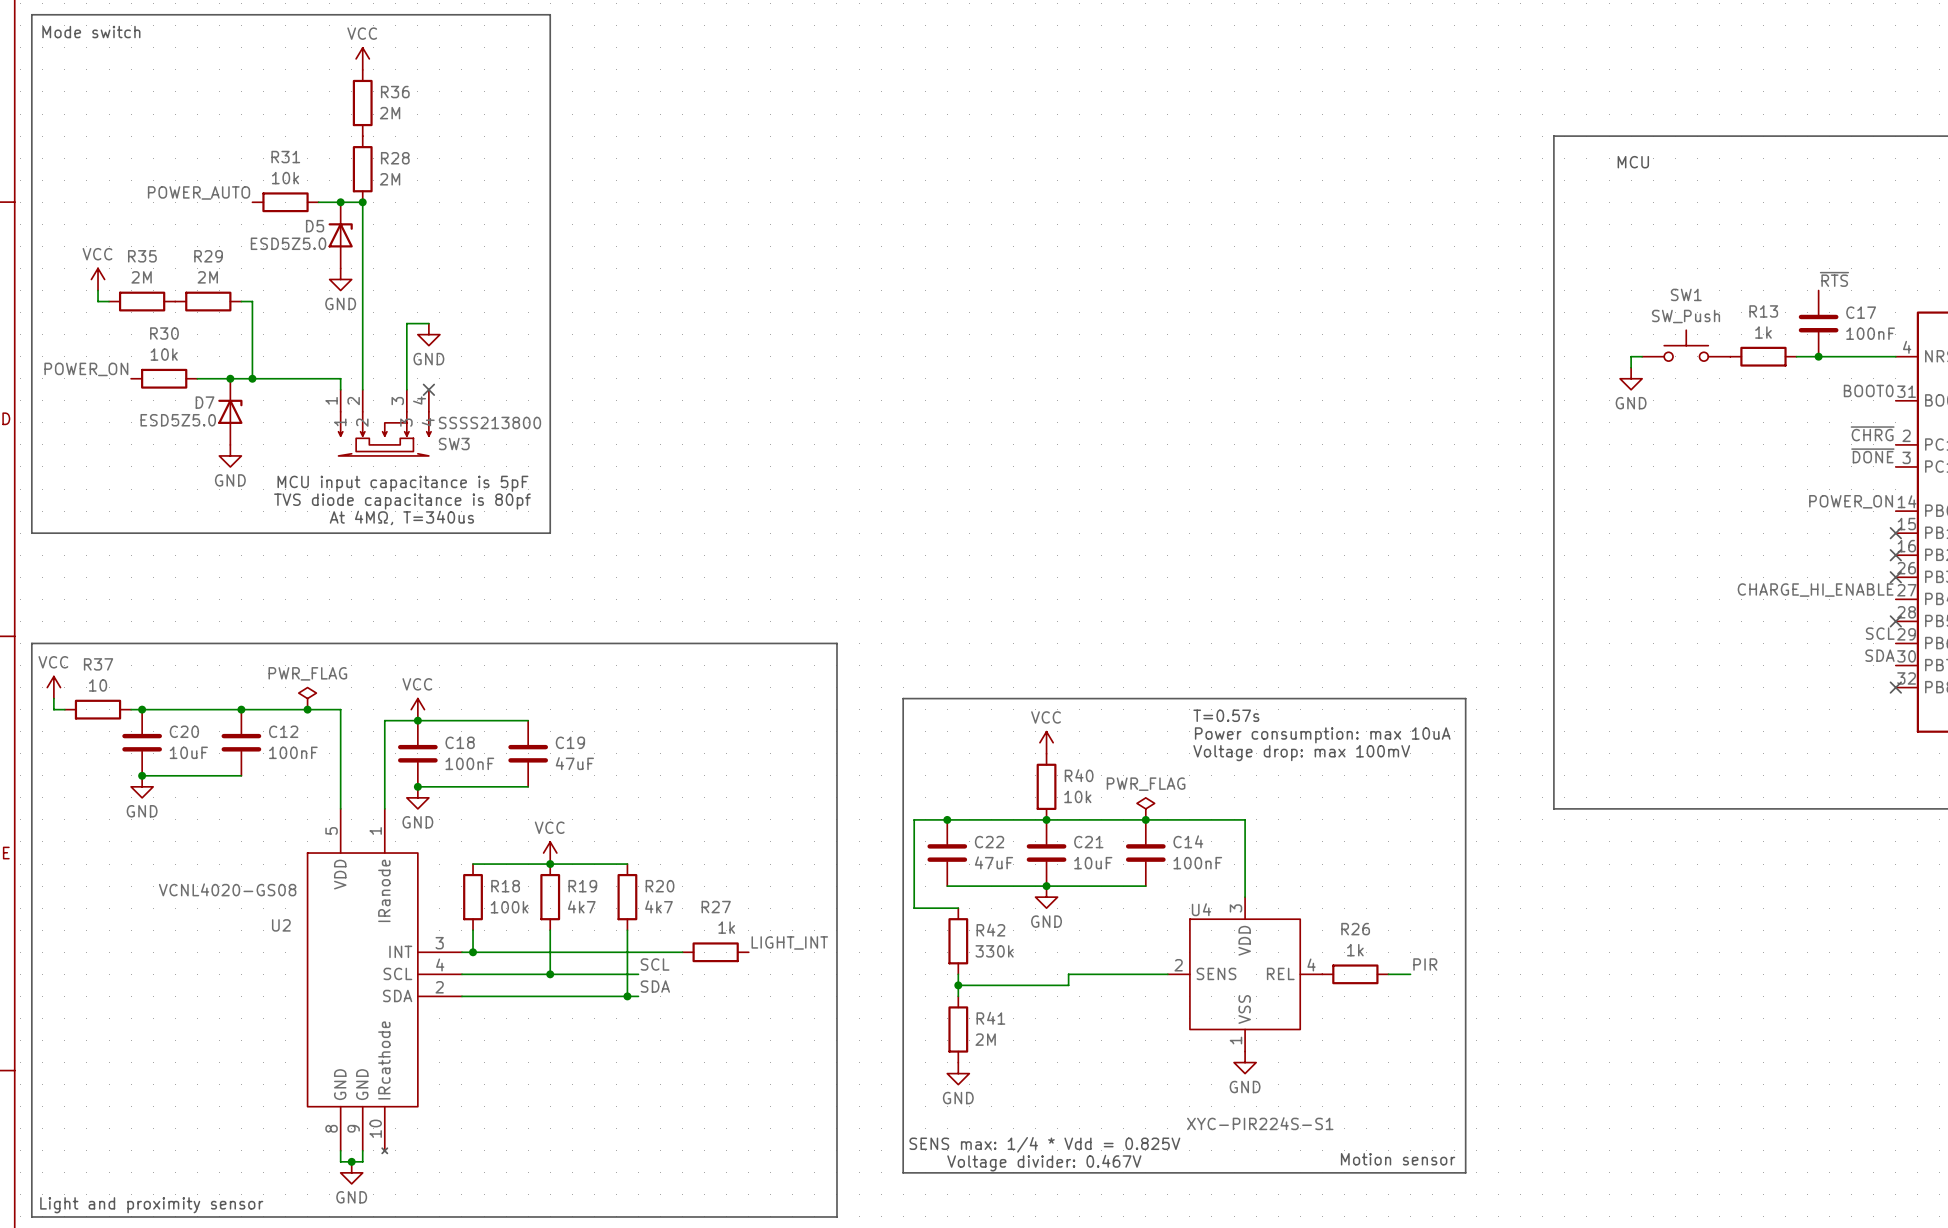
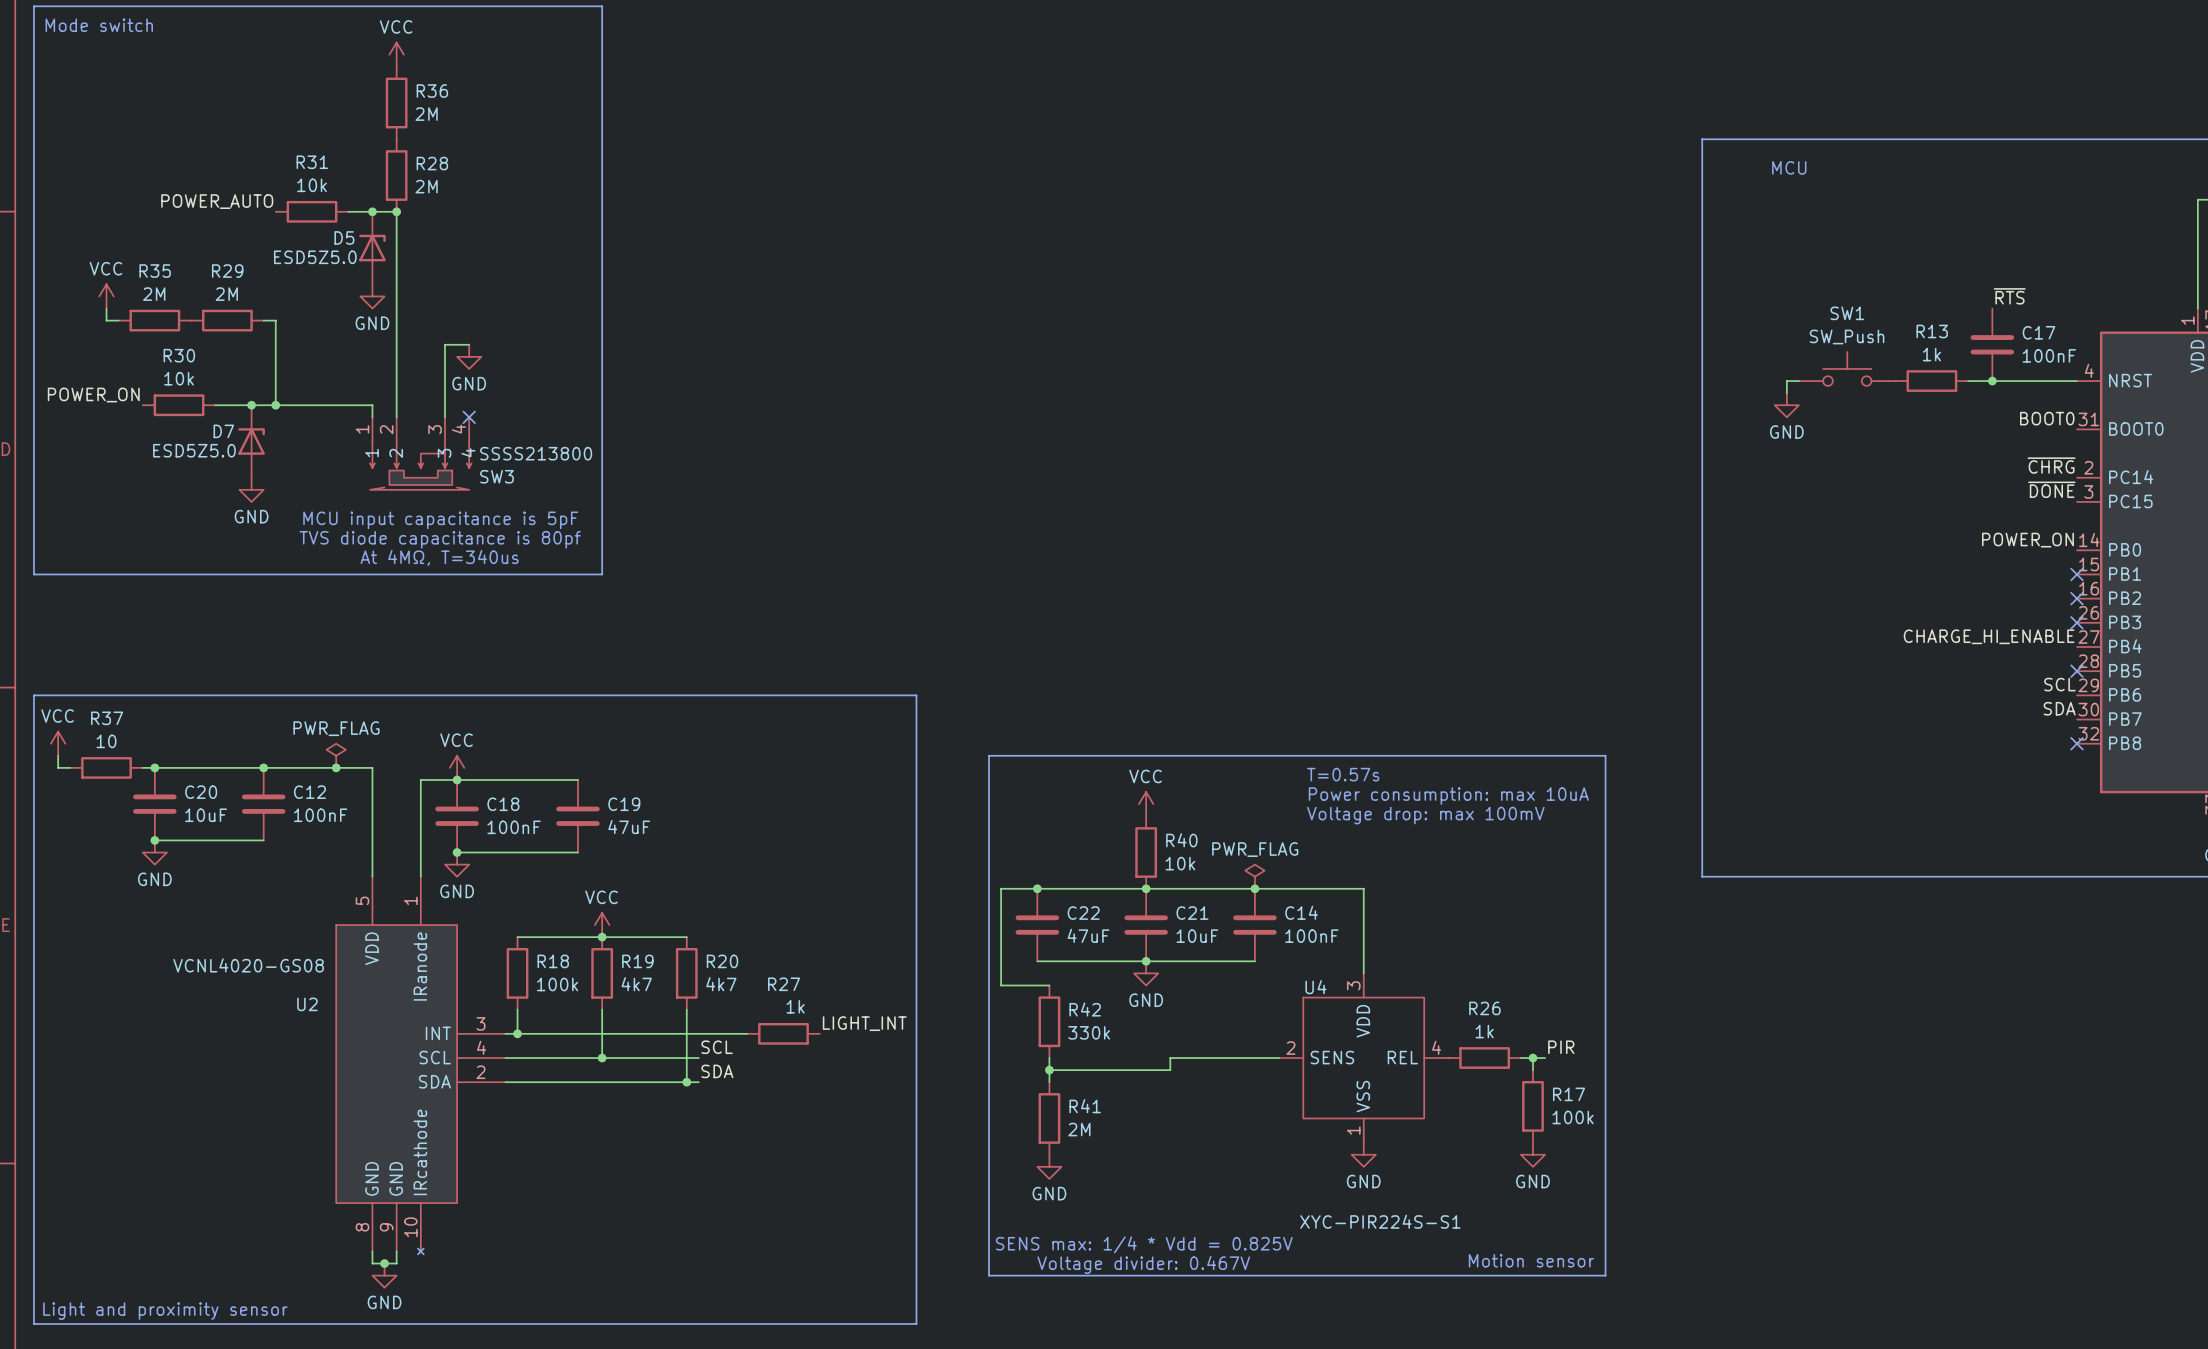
wire: none -> (1532, 1058) (1532, 1070)
junction: none -> (1532, 1058)
R17: none -> 100k (1532, 1106)
power symbol: none -> GND (1532, 1154)

